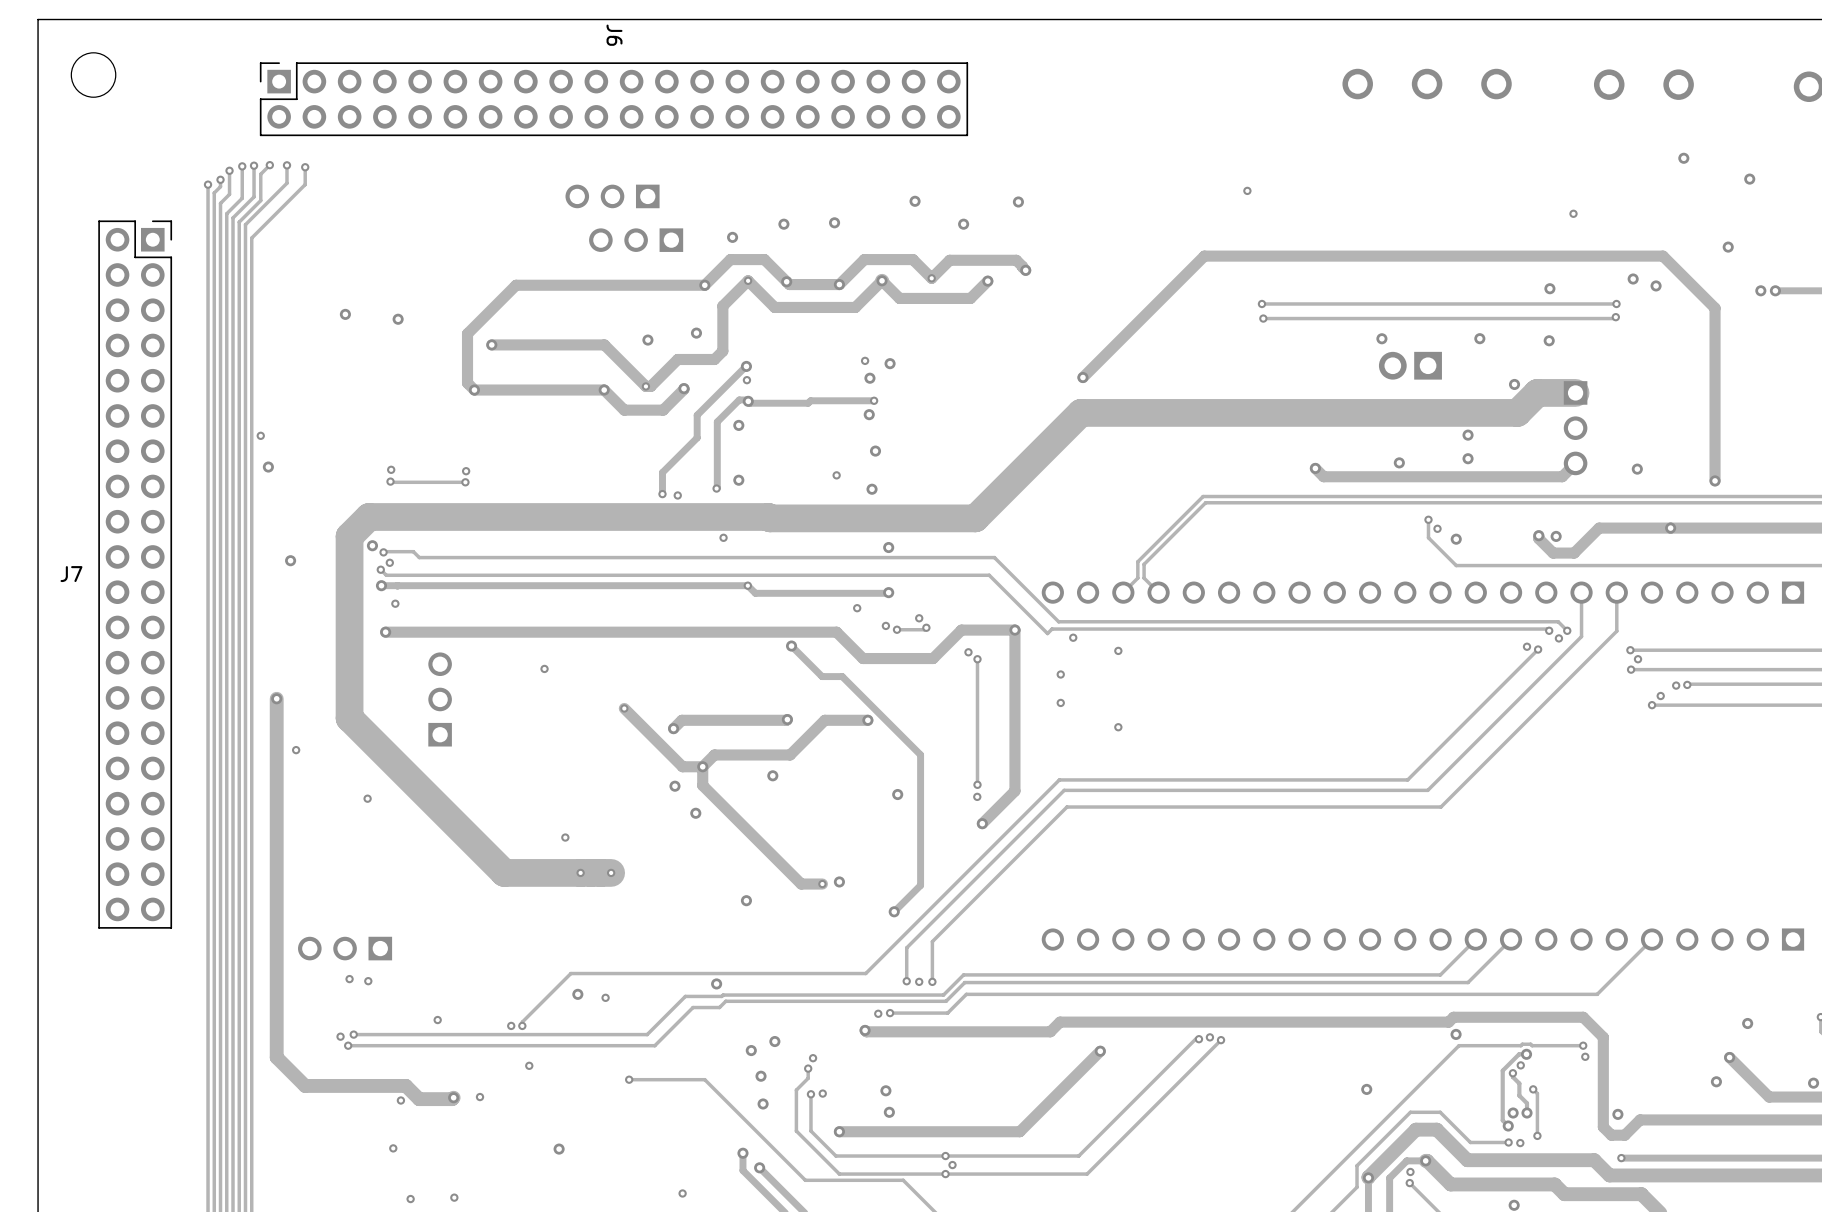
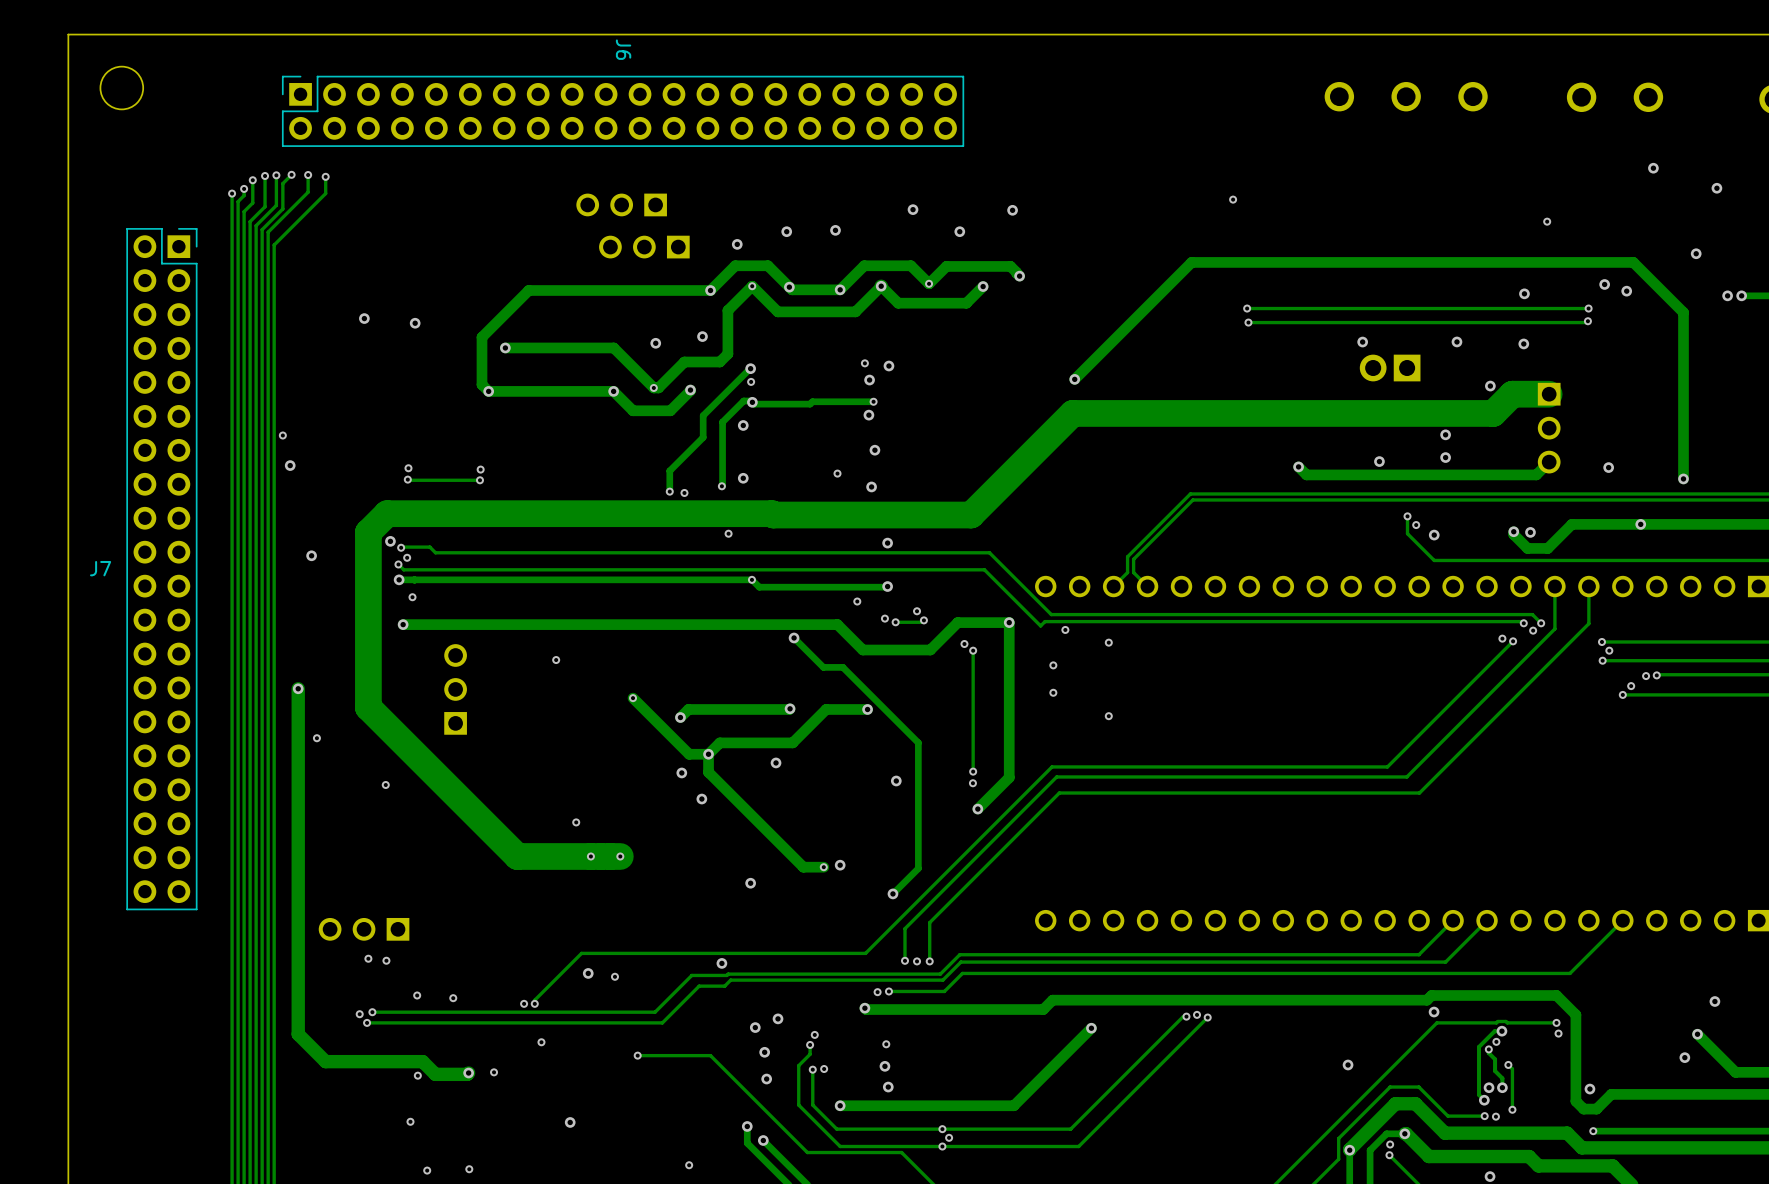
via: none -> (417, 995)
via: none -> (886, 1044)

